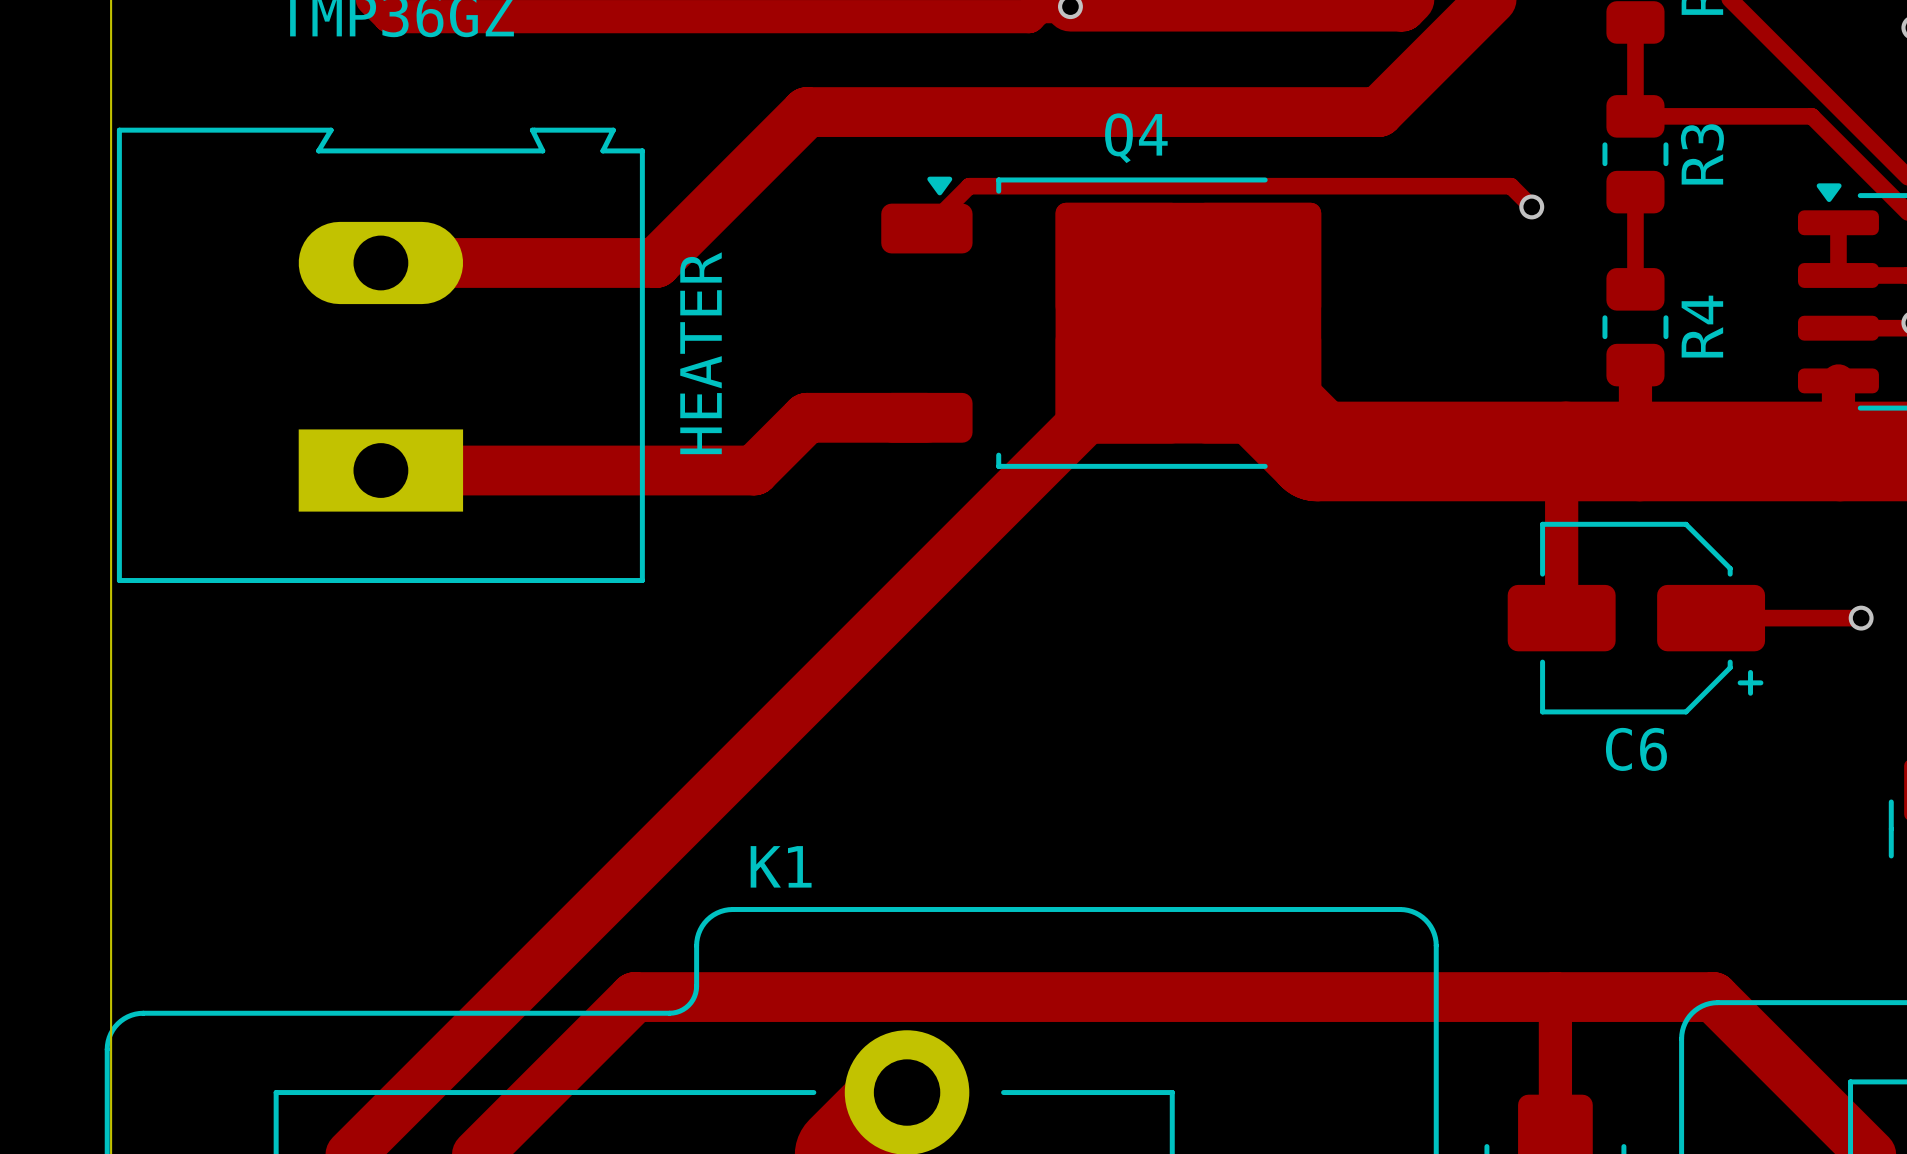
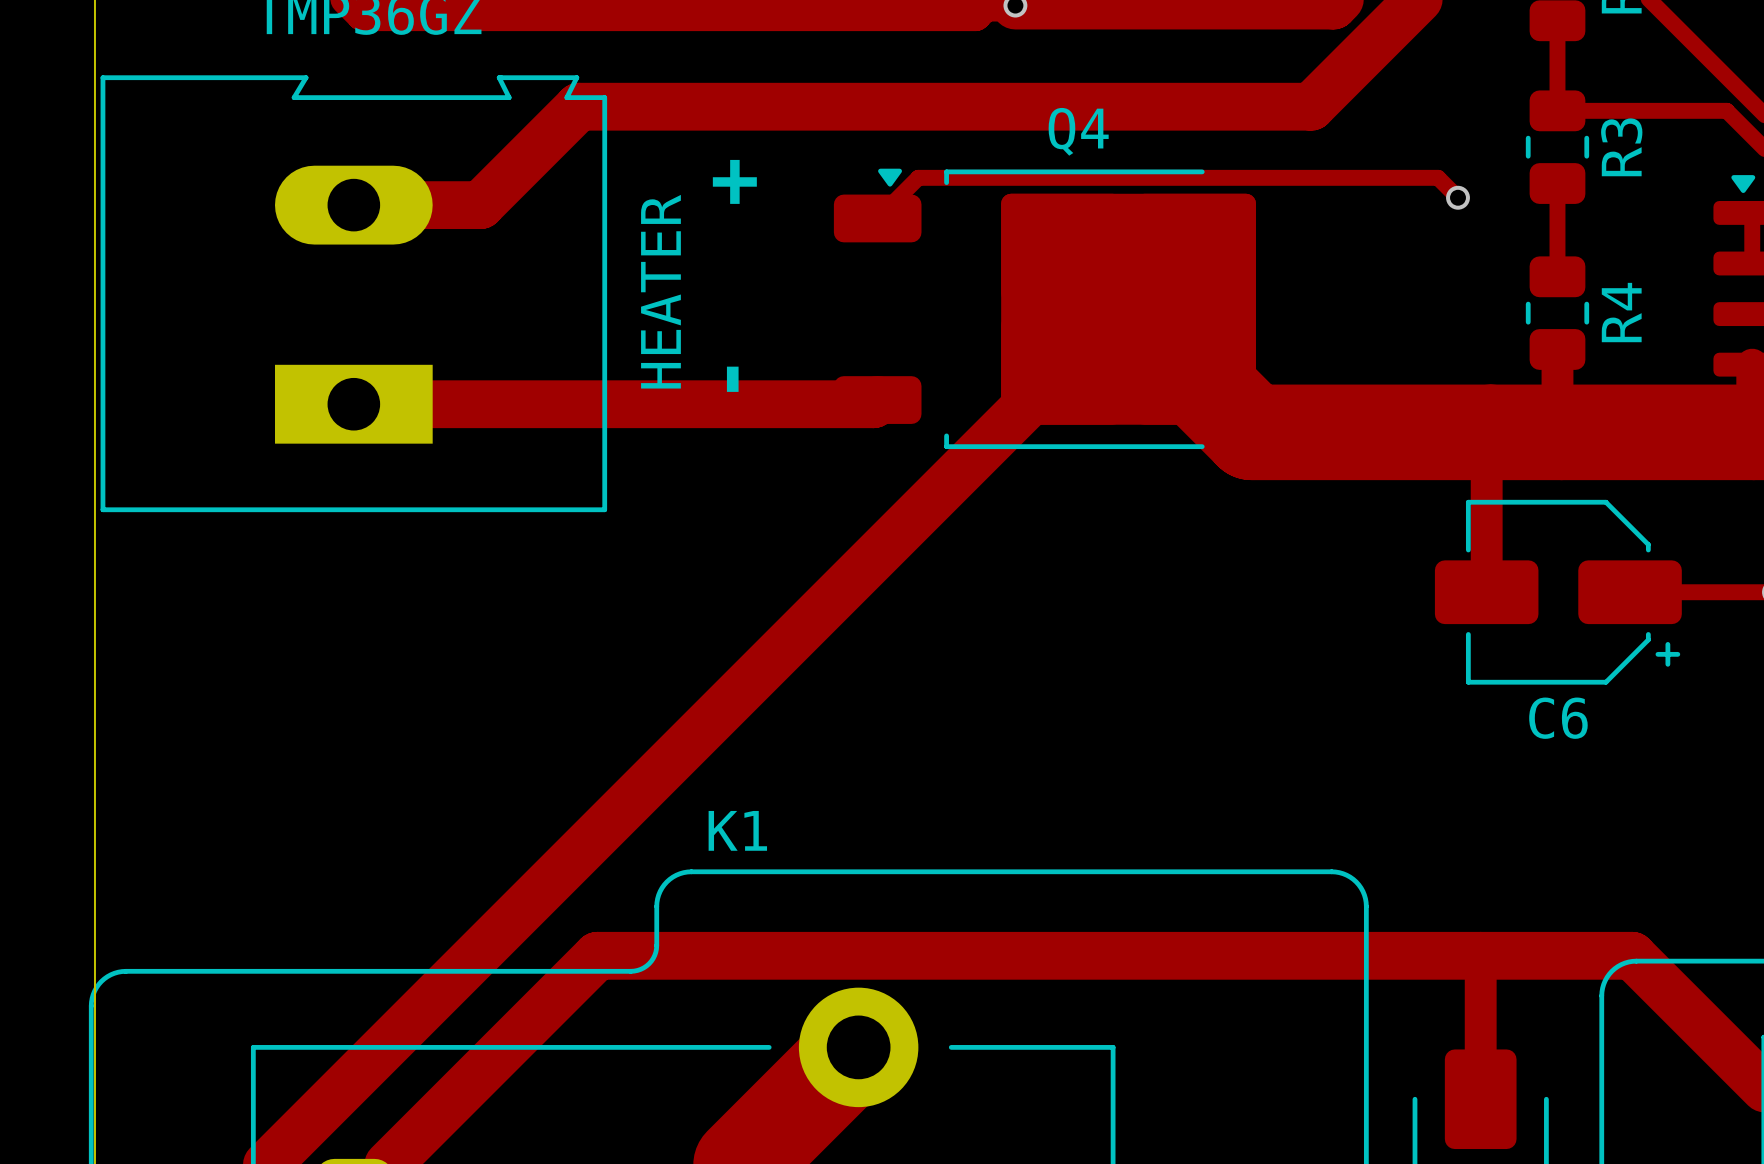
track: (806, 112) (655, 262) (380, 262) -> (762, 106) (578, 106) (480, 205) (353, 205)
text: none -> + - (734, 275)
part position: (380, 355) -> (353, 293)
track: (926, 417) (806, 417) (754, 470) (380, 470) -> (877, 400) (873, 404) (353, 404)

